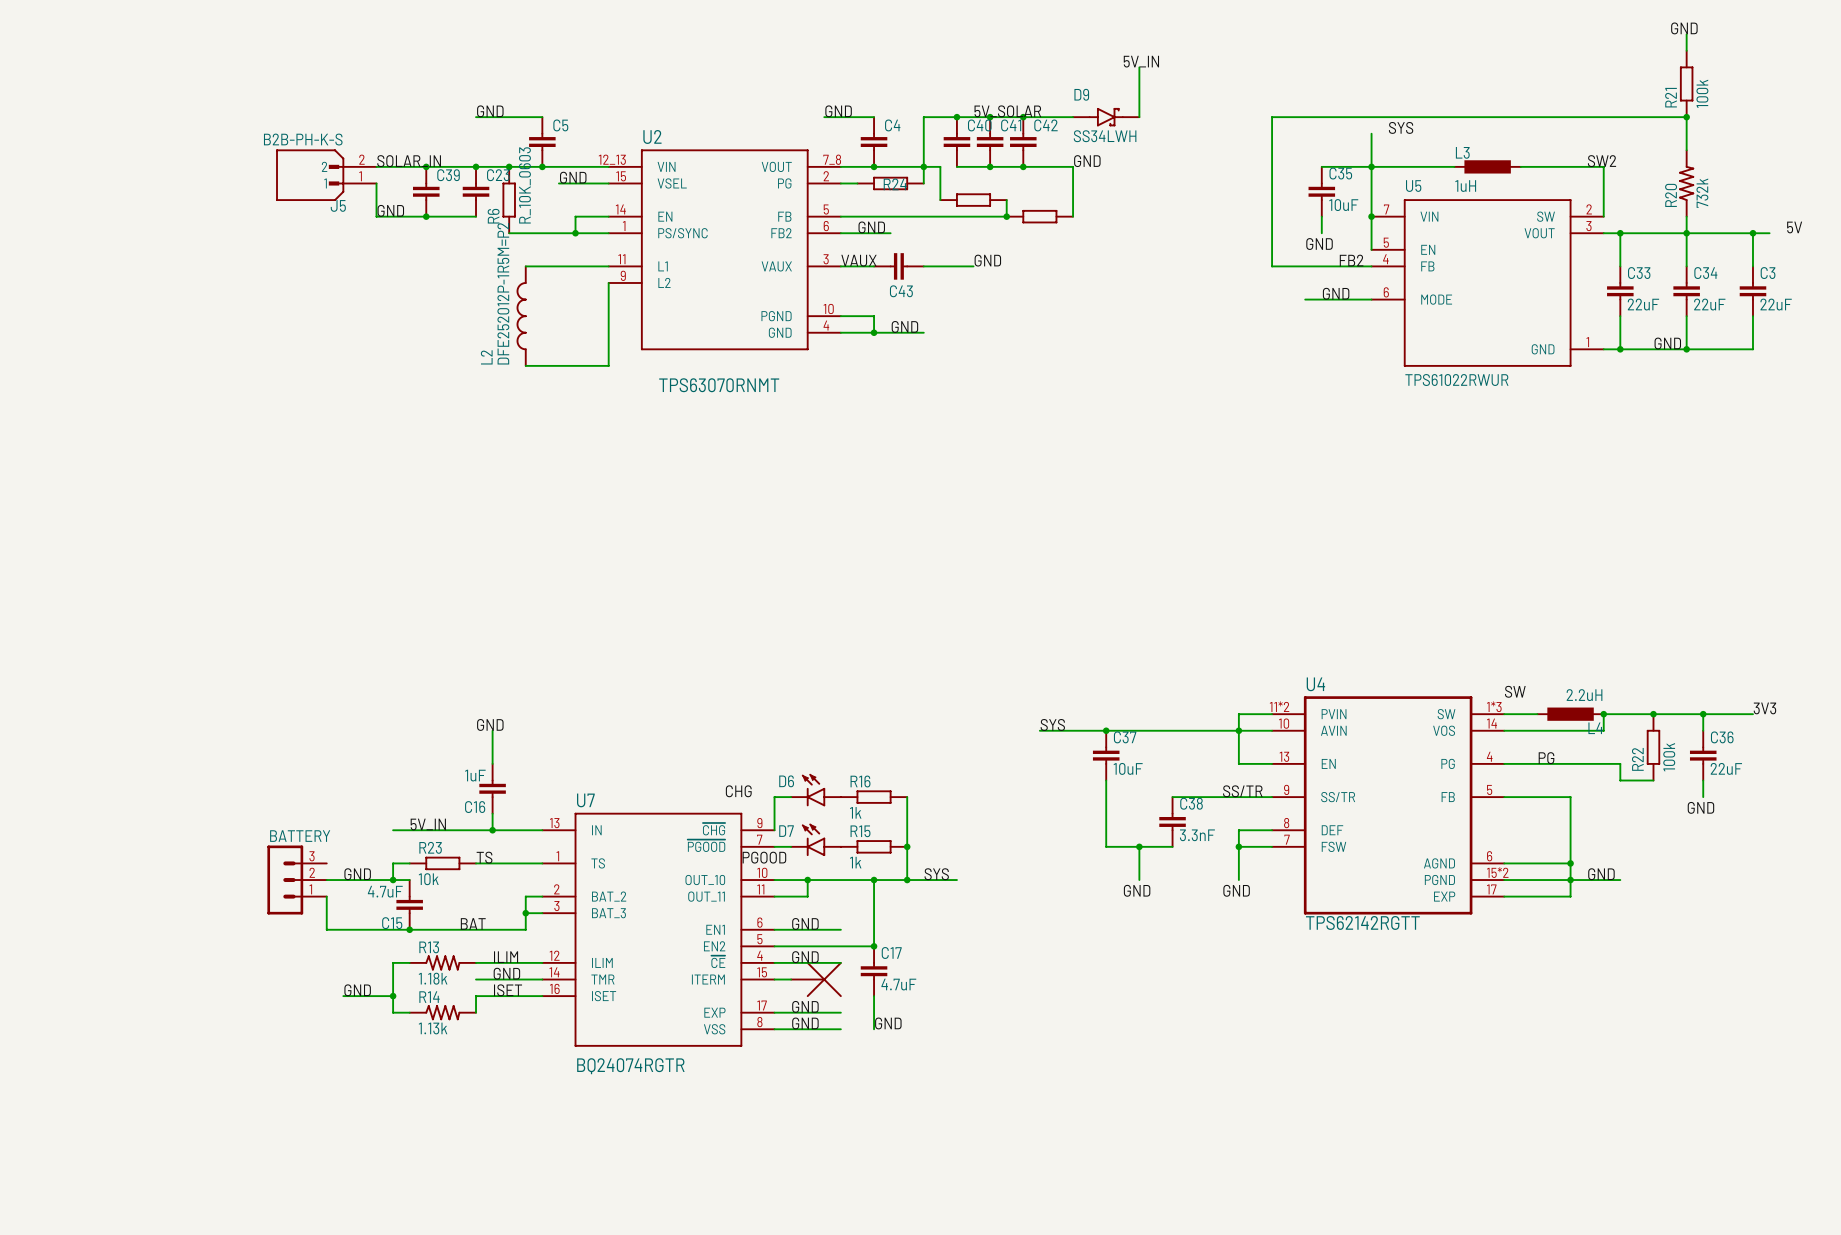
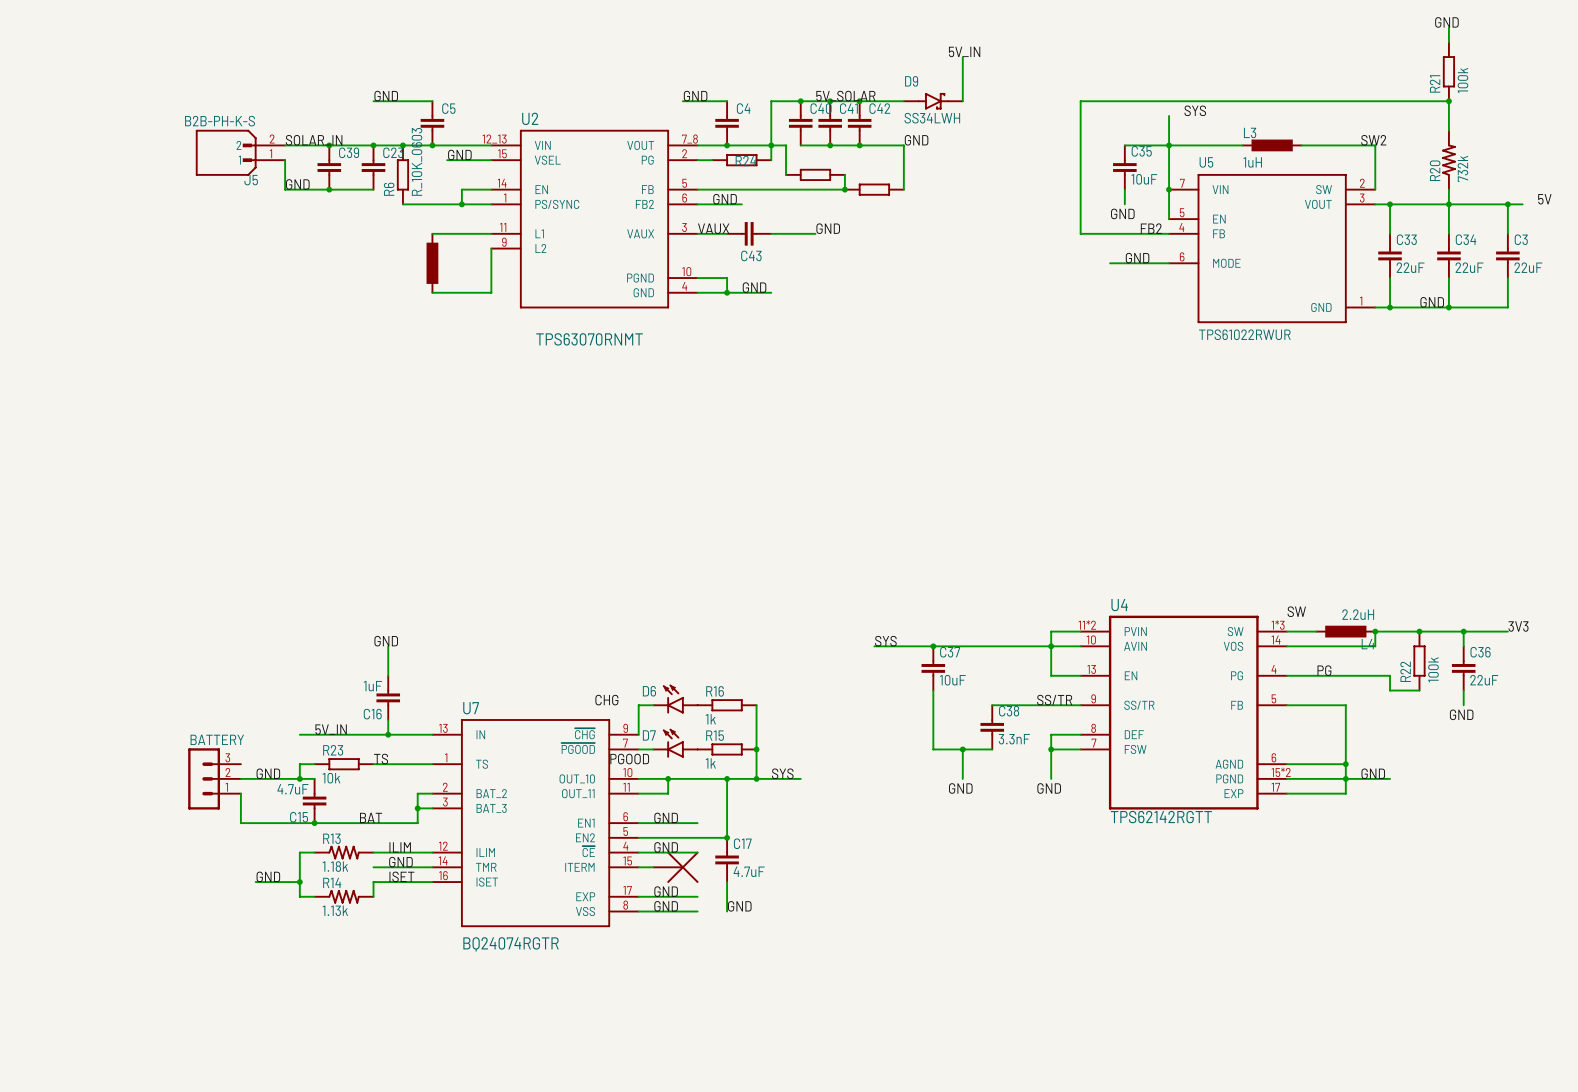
wire: (525, 266) (542, 266) -> none
part: none -> (432, 263)
L2: DFE252012P-1R5M=P2 (521, 316) -> none
wire: (608, 332) (608, 365) (525, 365) -> (491, 292) (432, 292)

